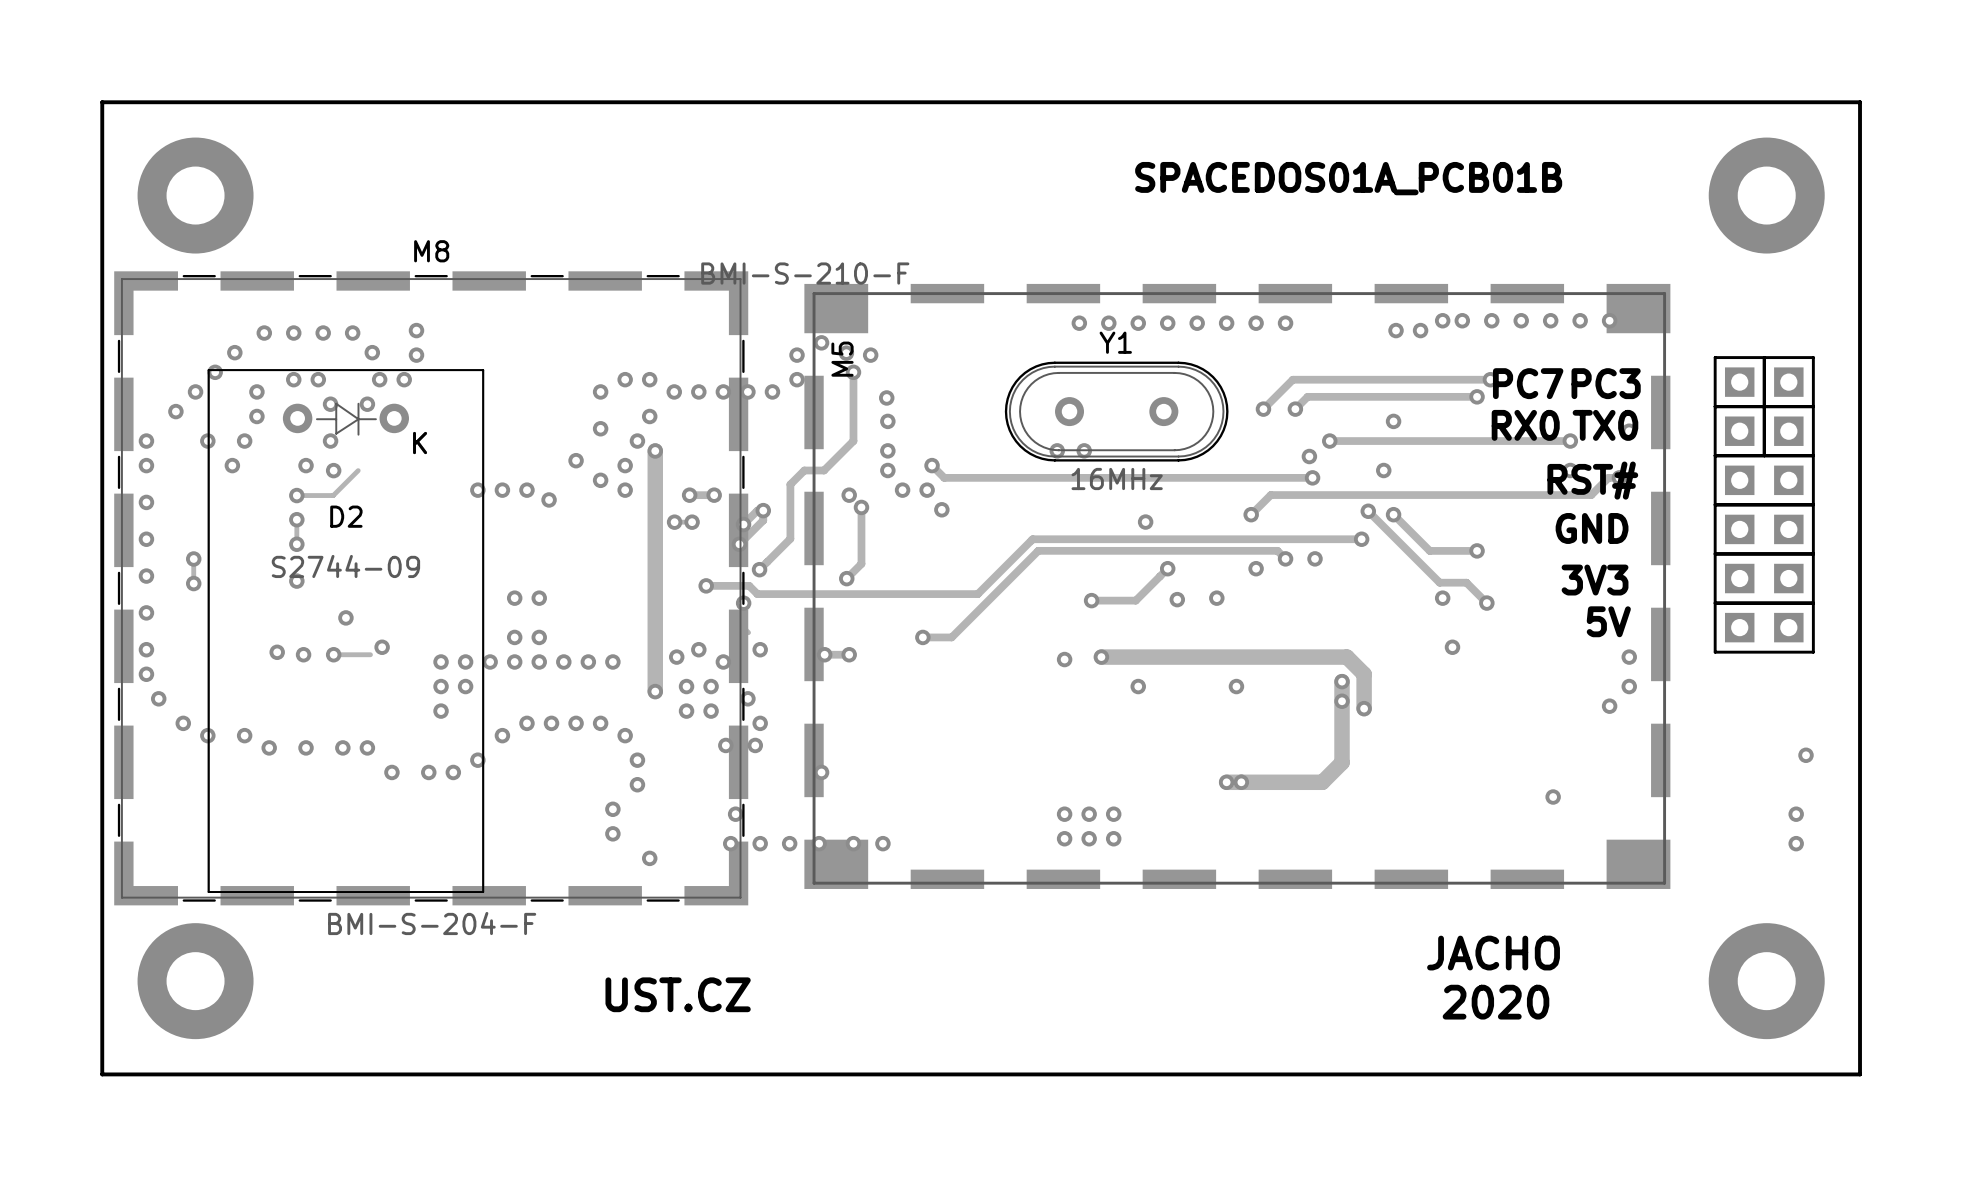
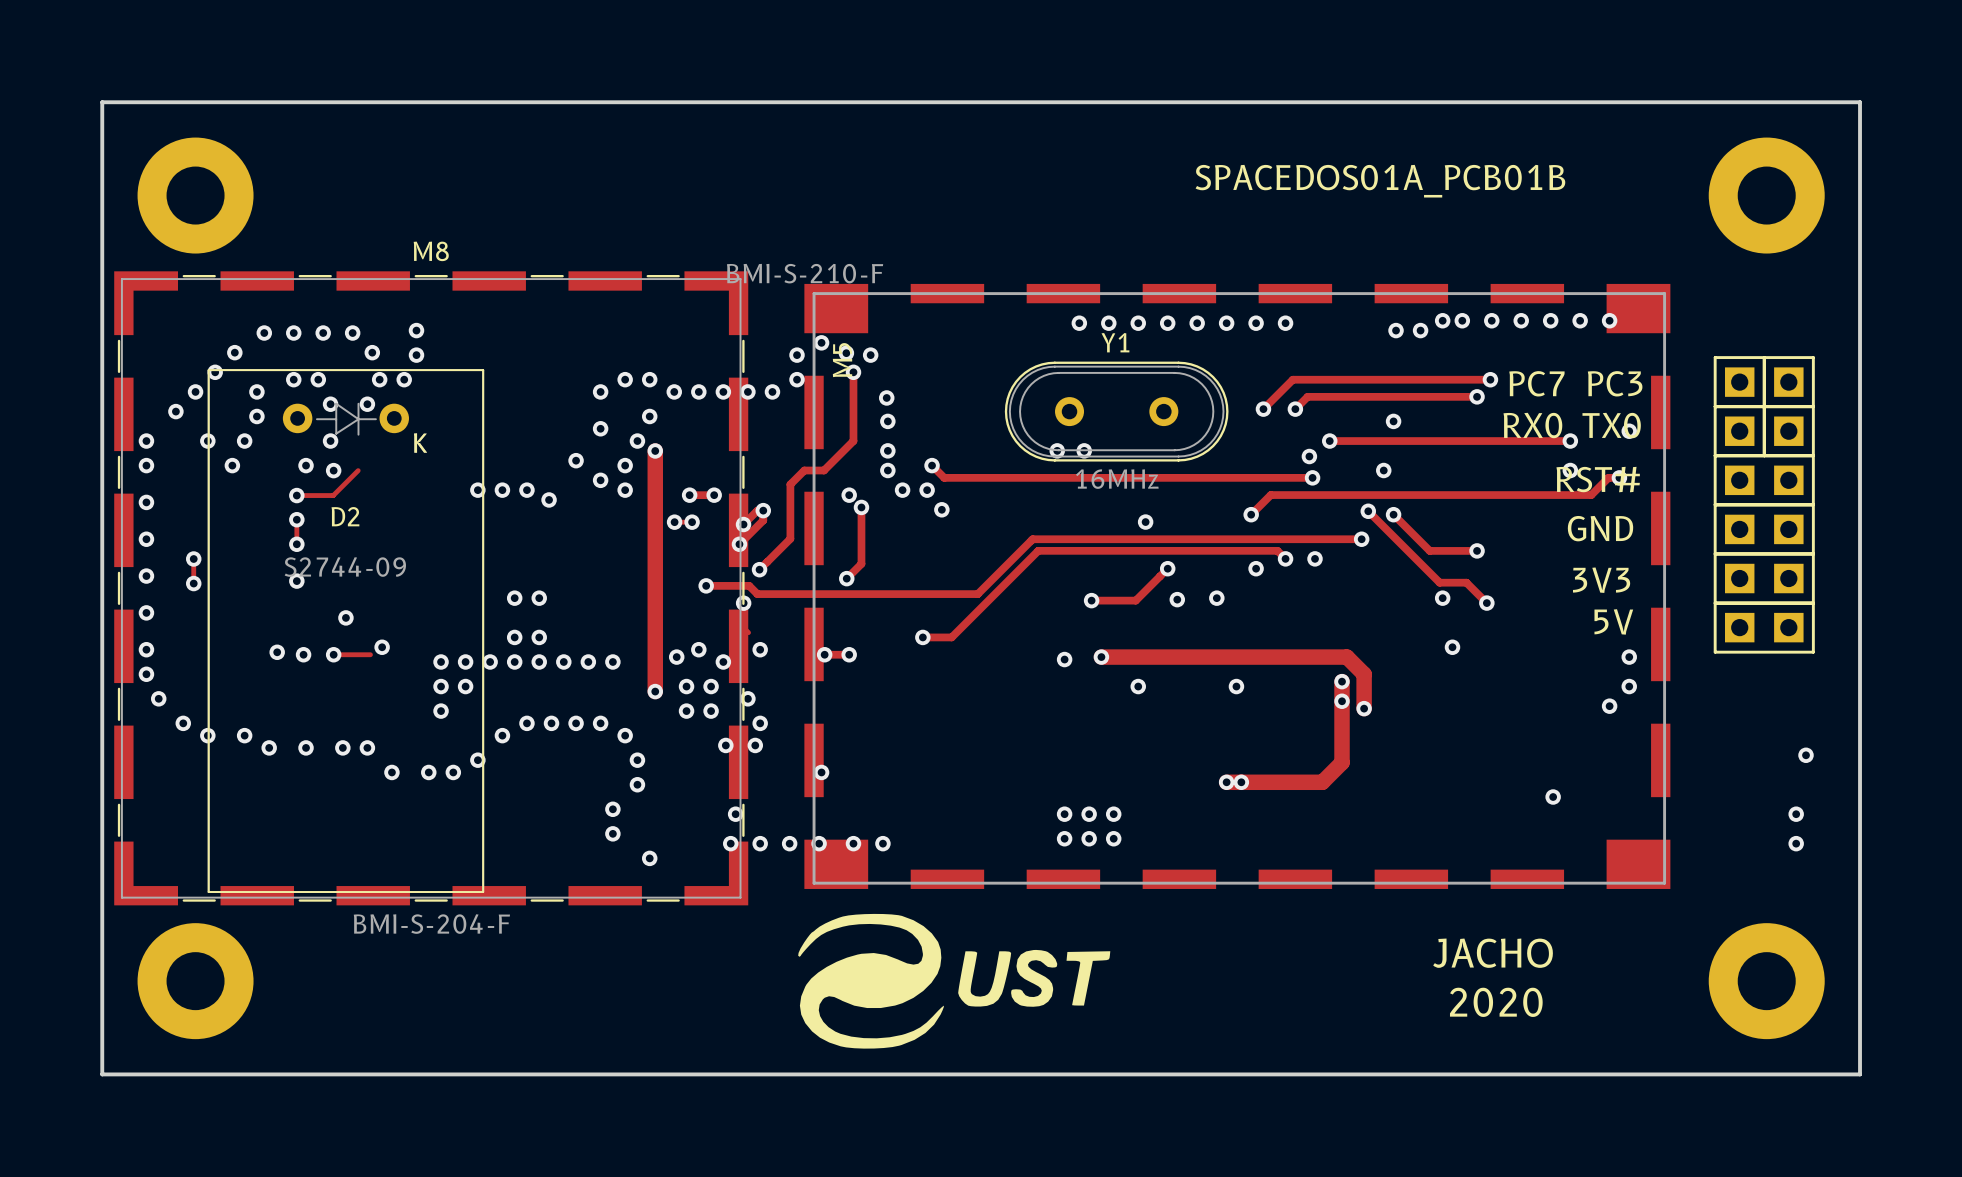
drawing: none -> [798, 913, 1111, 1049]
text: UST.CZ (678, 994) -> none

